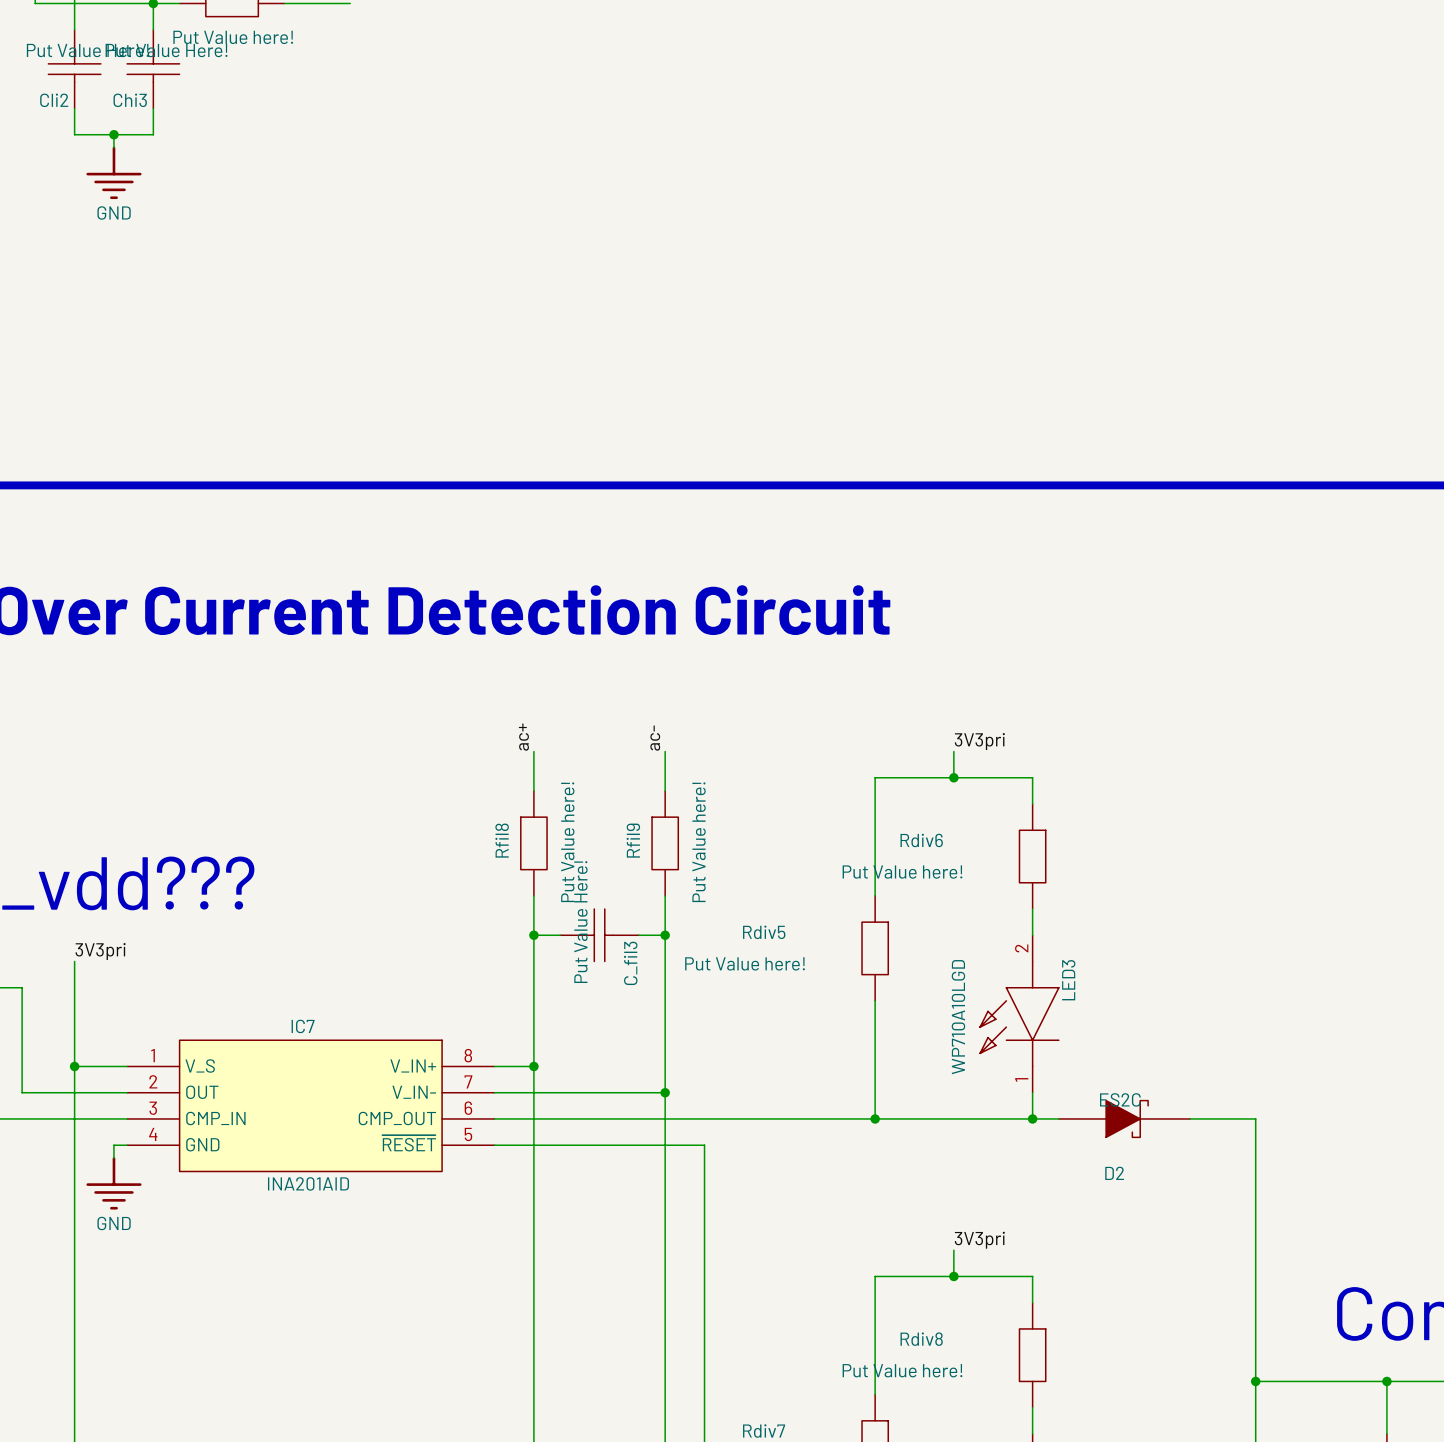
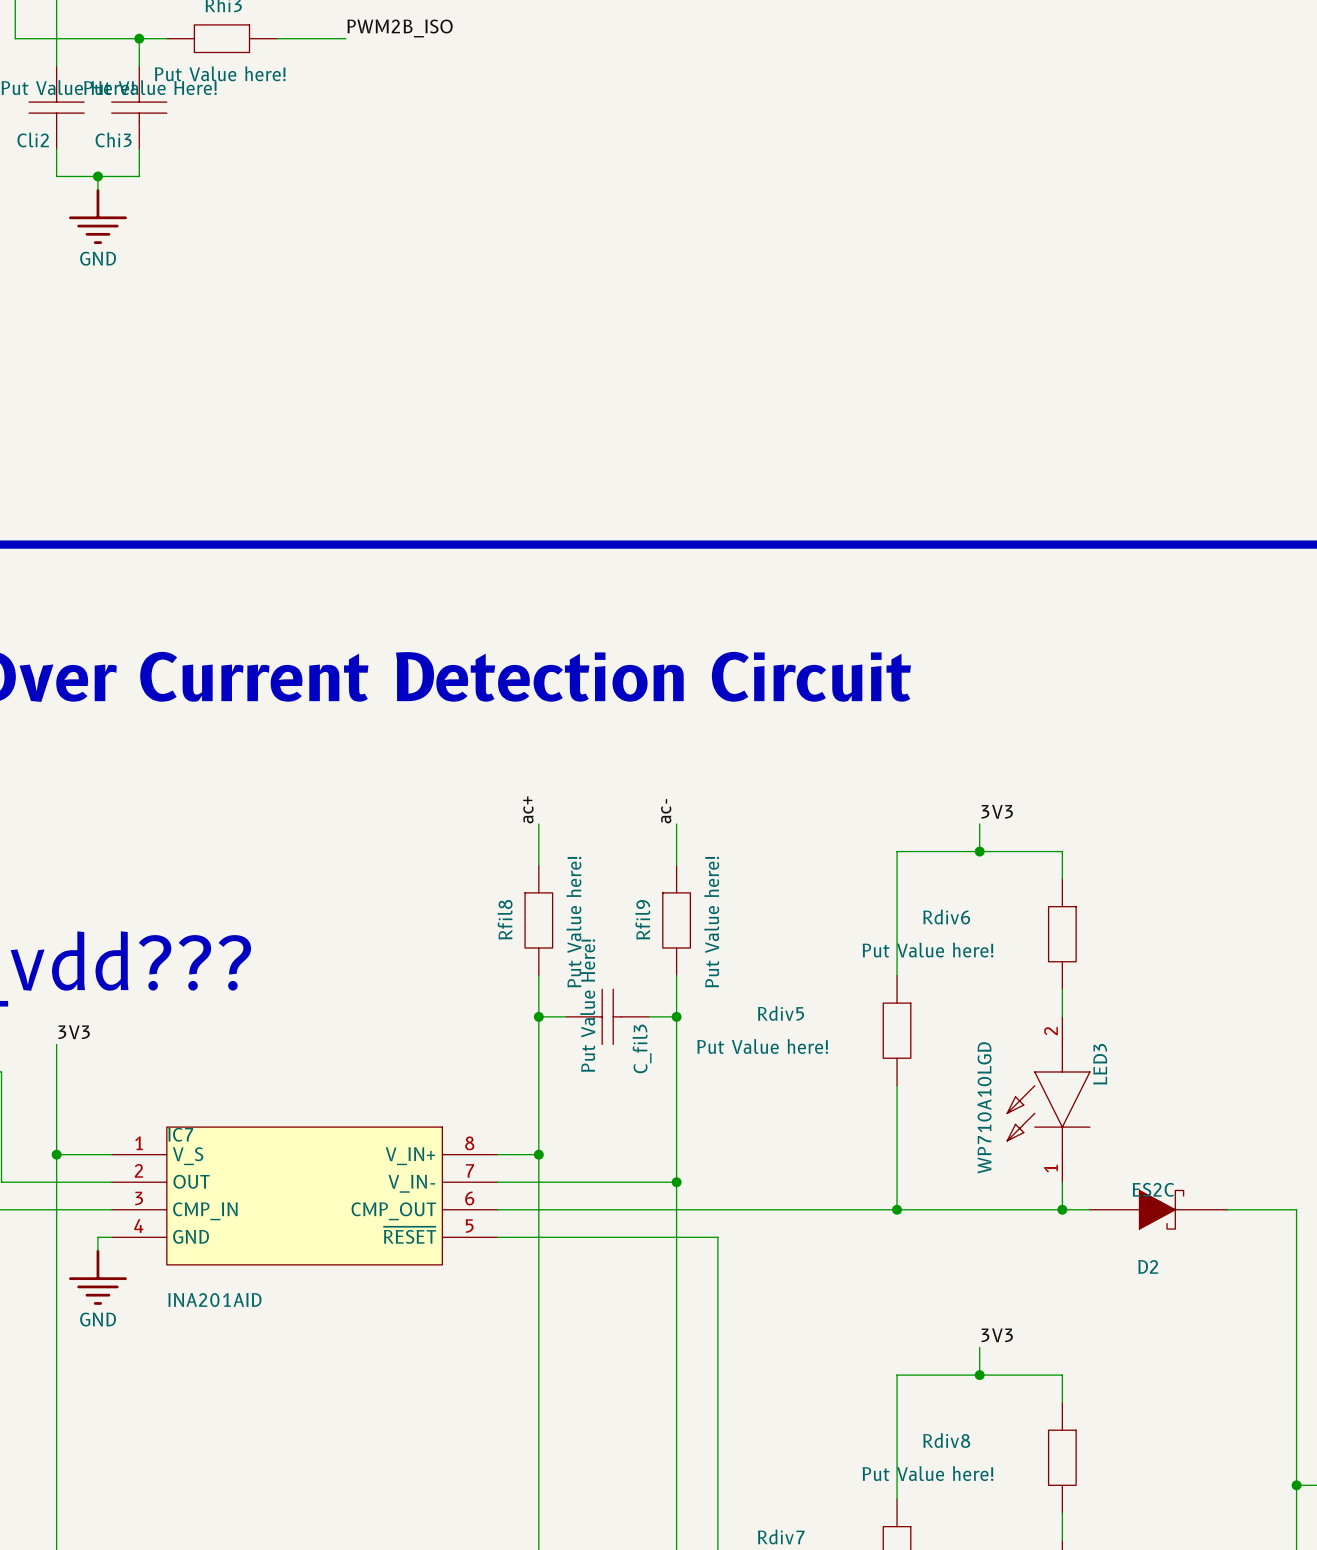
label: 3V3pri (979, 741) -> 3V3 (997, 811)
label: 3V3pri (100, 951) -> 3V3 (74, 1032)
IC7 name position: IC7 (303, 1026) -> IC7 (180, 1134)
IC7 value position: INA201AID (308, 1183) -> INA201AID (214, 1300)
label: 3V3pri (979, 1240) -> 3V3 (997, 1335)

